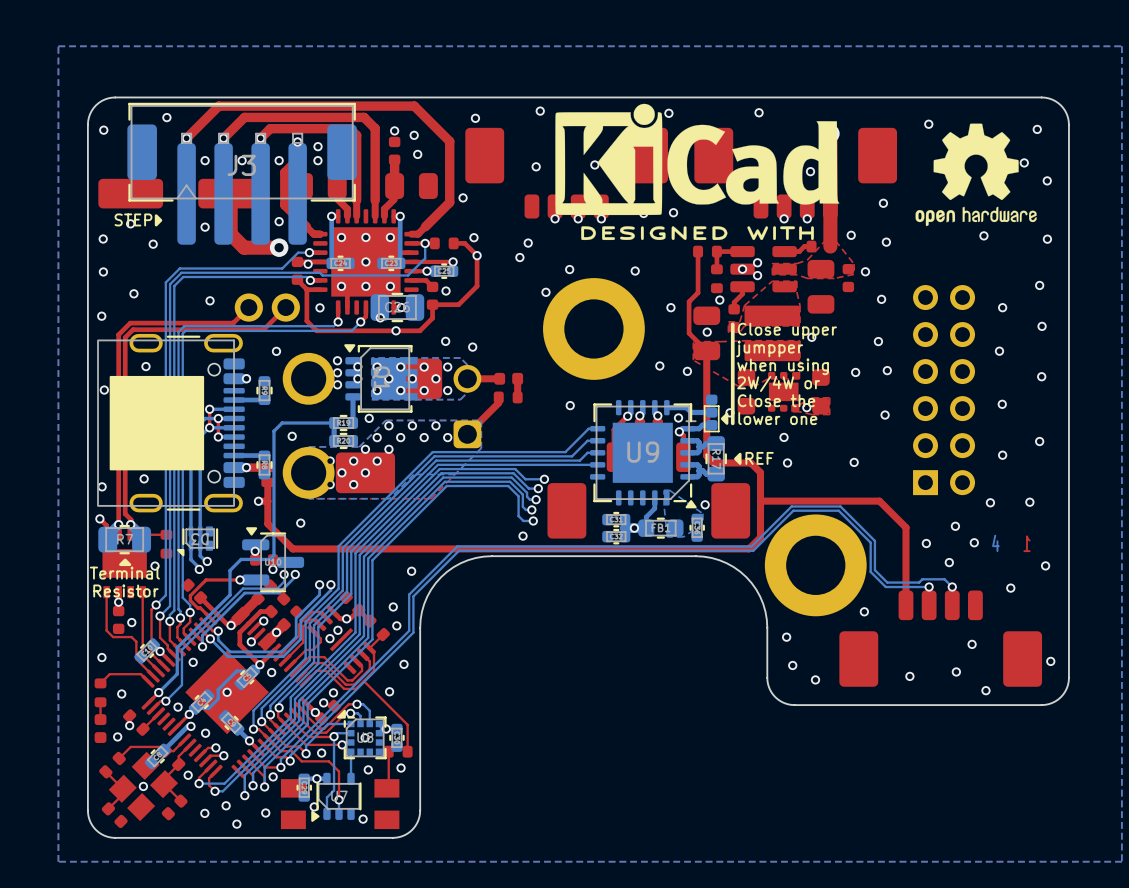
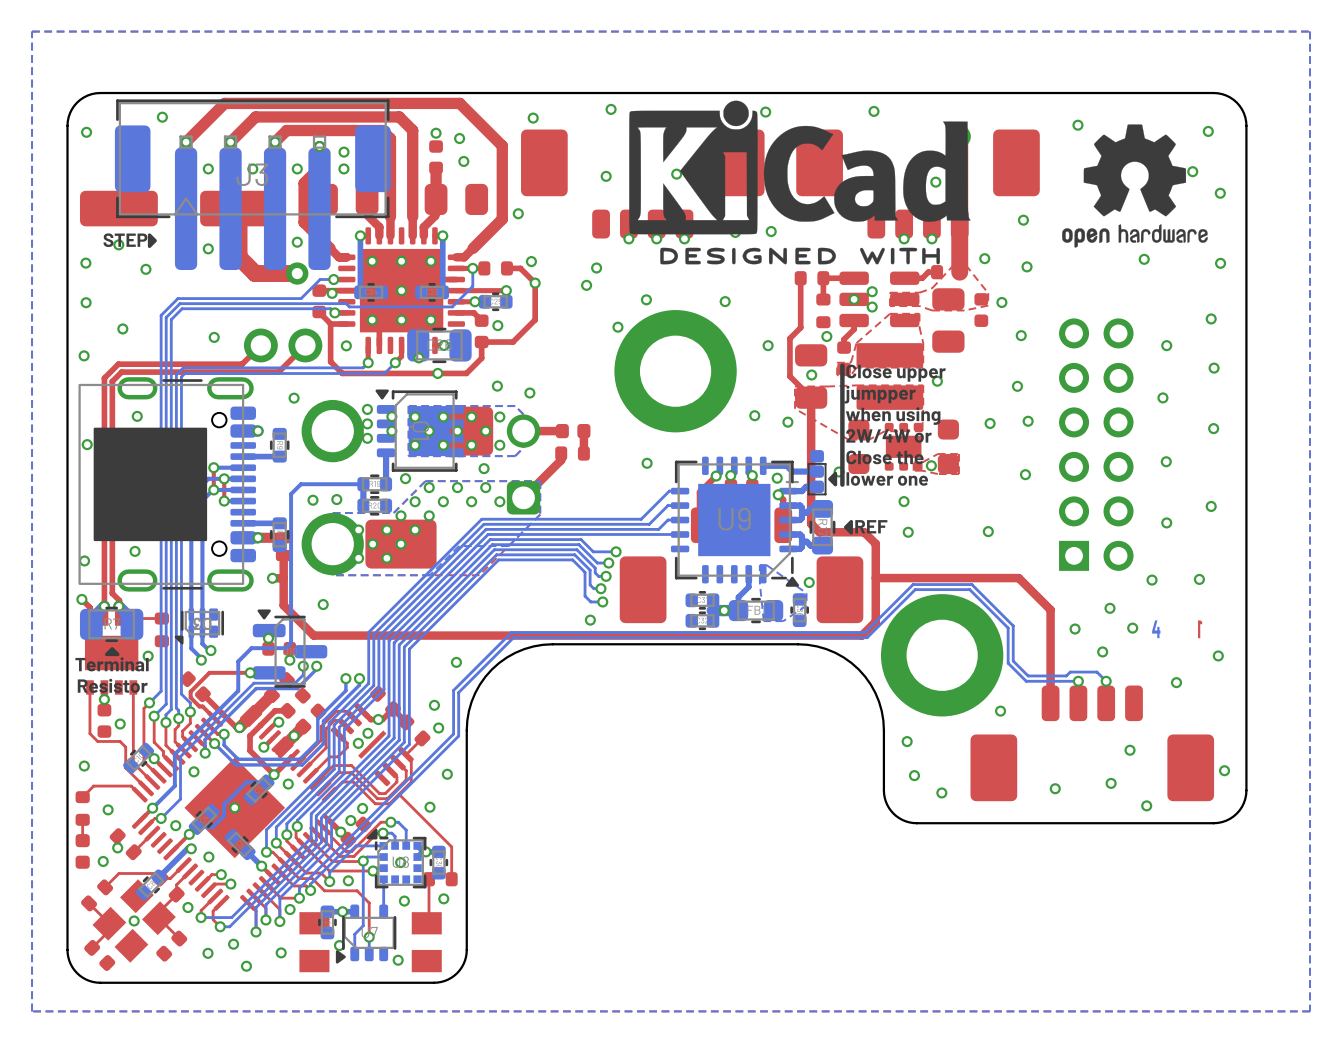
via: none -> (484, 468)
via: none -> (336, 499)

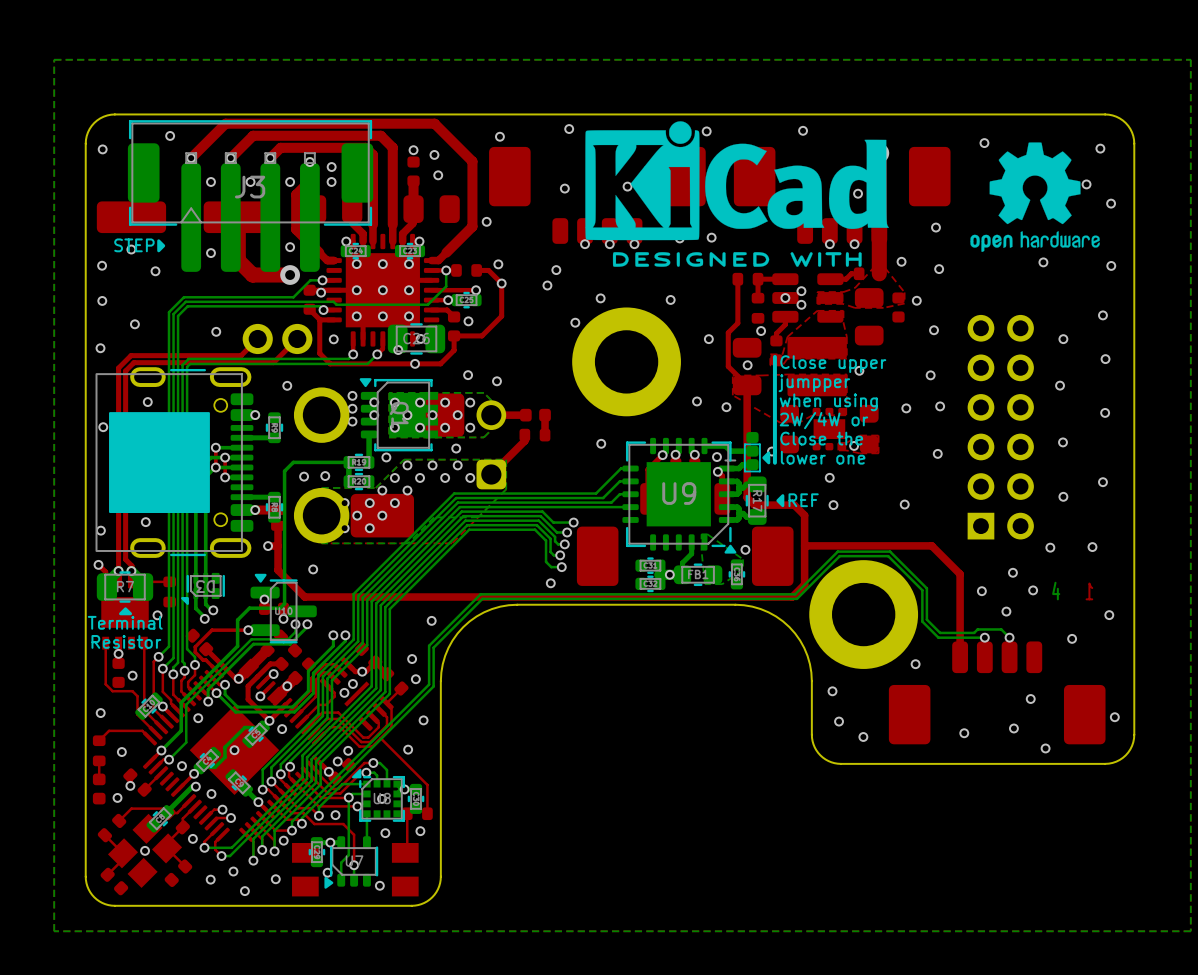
bottom track: (360, 246) (360, 292) -> none
bottom track: (442, 246) (442, 292) -> none
via: none -> (356, 290)
via: none -> (409, 290)
part position: (371, 292) -> (355, 251)
part position: (432, 292) -> (410, 251)

